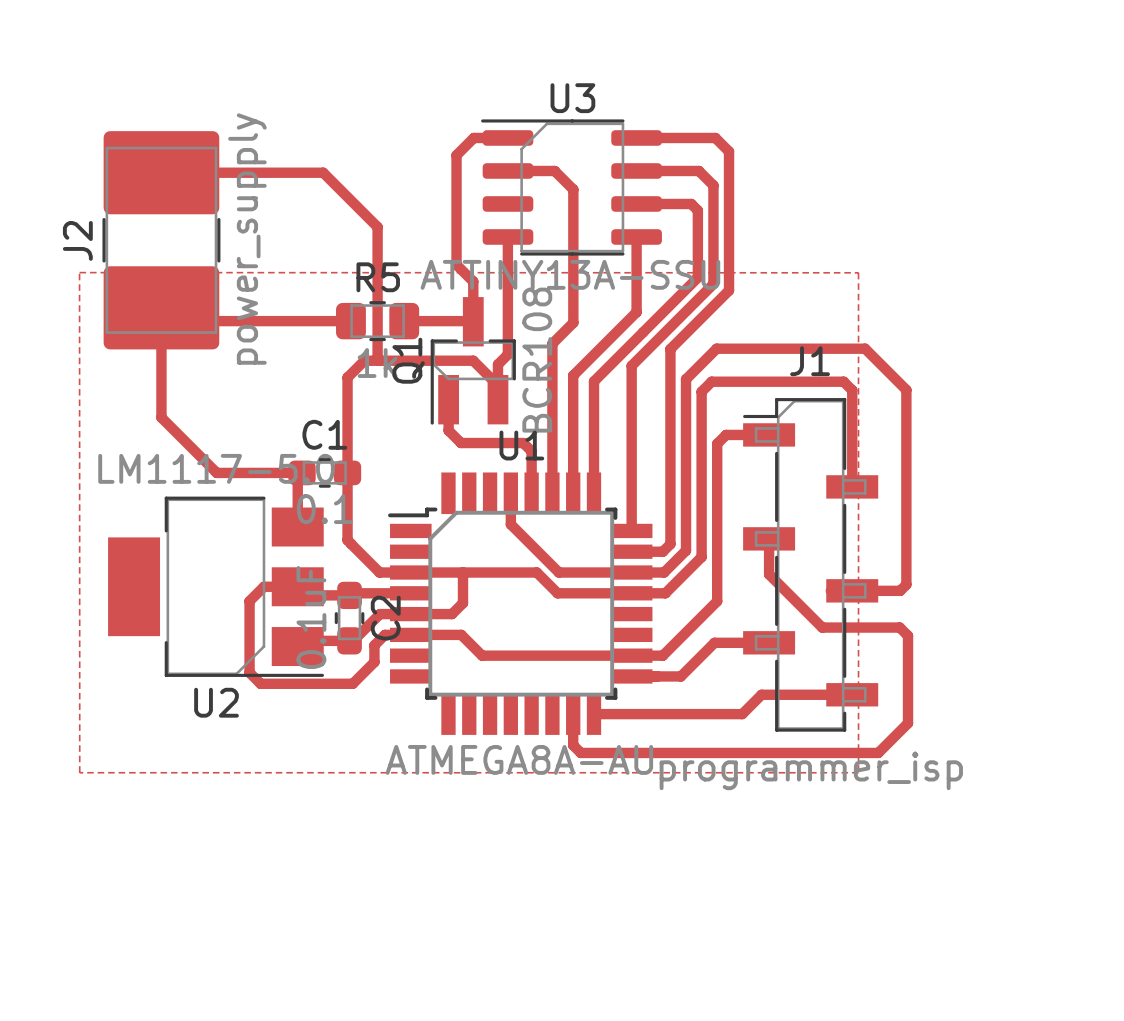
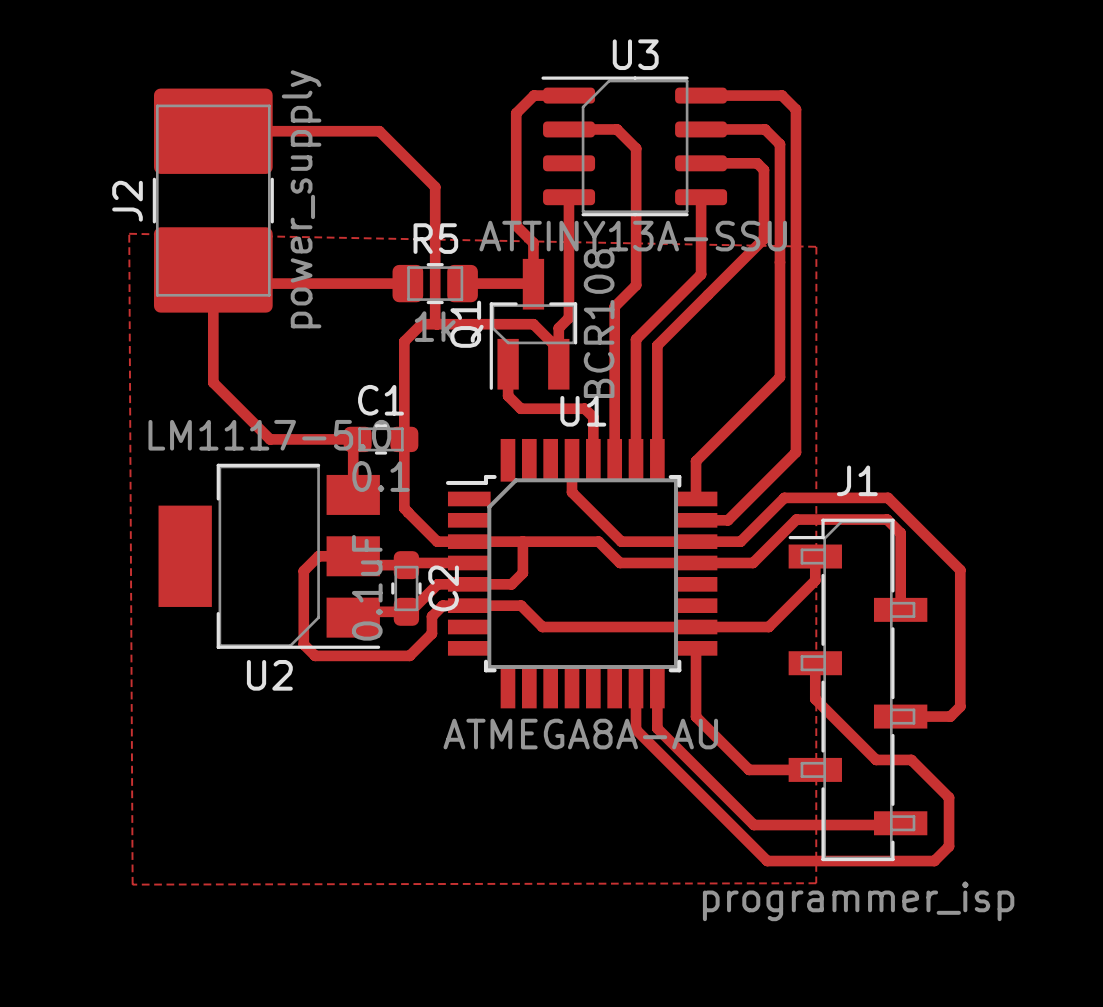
top zone outline: (79, 272) (79, 772) (858, 772) (858, 272) (79, 272) -> (129, 233) (132, 884) (816, 883) (816, 246) (129, 233)
top track: (713, 284) (631, 365) (631, 494) -> (779, 245) (779, 377) (696, 461)
top track: (729, 290) (670, 349) (670, 544) -> (795, 252) (795, 452) (735, 512)
top track: (769, 434) (726, 434) (717, 443) (717, 601) (662, 655) -> (815, 556) (815, 580) (768, 627) (728, 627)
top track: (852, 486) (852, 390) (843, 381) (711, 381) (701, 391) (701, 557) (665, 593) -> (900, 609) (900, 533) (887, 519) (796, 519) (753, 562) (730, 562)
top track: (769, 538) (769, 574) (822, 627) (899, 627) (908, 635) (908, 723) (878, 752) (580, 752) (573, 745) -> (815, 663) (815, 699) (876, 759) (911, 759) (949, 797) (949, 846) (934, 861) (767, 861) (636, 729) (636, 719)
J1 position: (810, 564) -> (857, 689)
top track: (664, 572) (686, 550) (686, 379) (716, 348) (865, 348) (906, 389) (906, 584) (900, 590) (830, 590) -> (729, 541) (740, 541) (784, 497) (888, 497) (960, 570) (960, 706) (950, 716) (900, 716)
top track: (769, 642) (714, 642) (680, 676) (631, 676) -> (815, 769) (749, 769) (696, 716) (696, 648)
top track: (830, 694) (761, 694) (742, 714) (593, 714) -> (874, 825) (753, 825) (657, 728) (657, 687)

